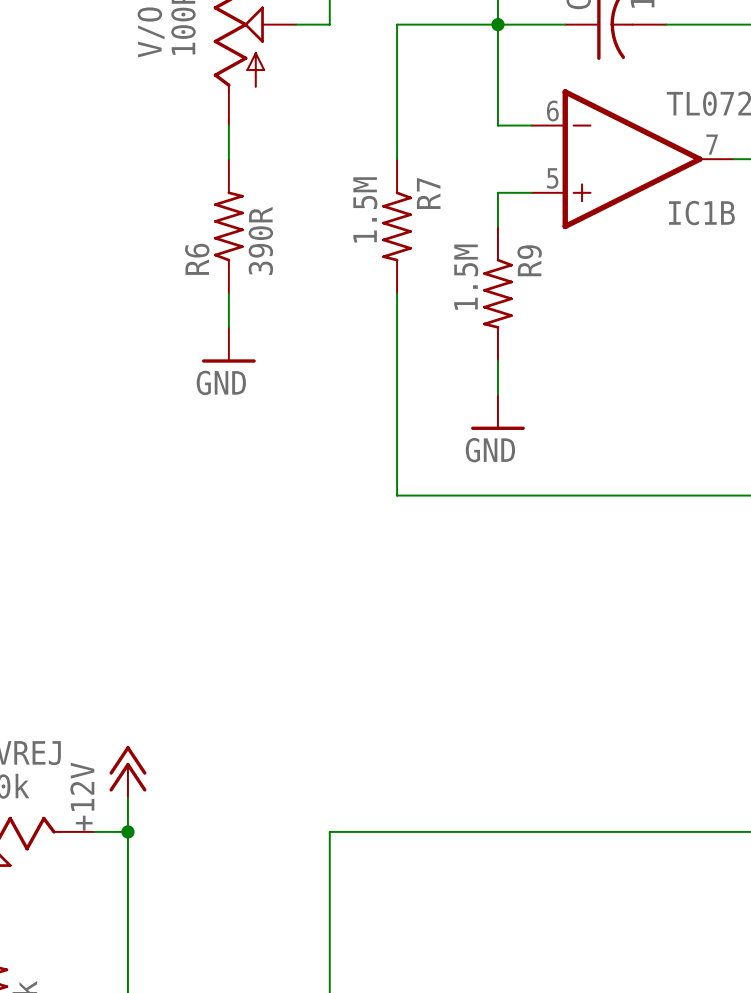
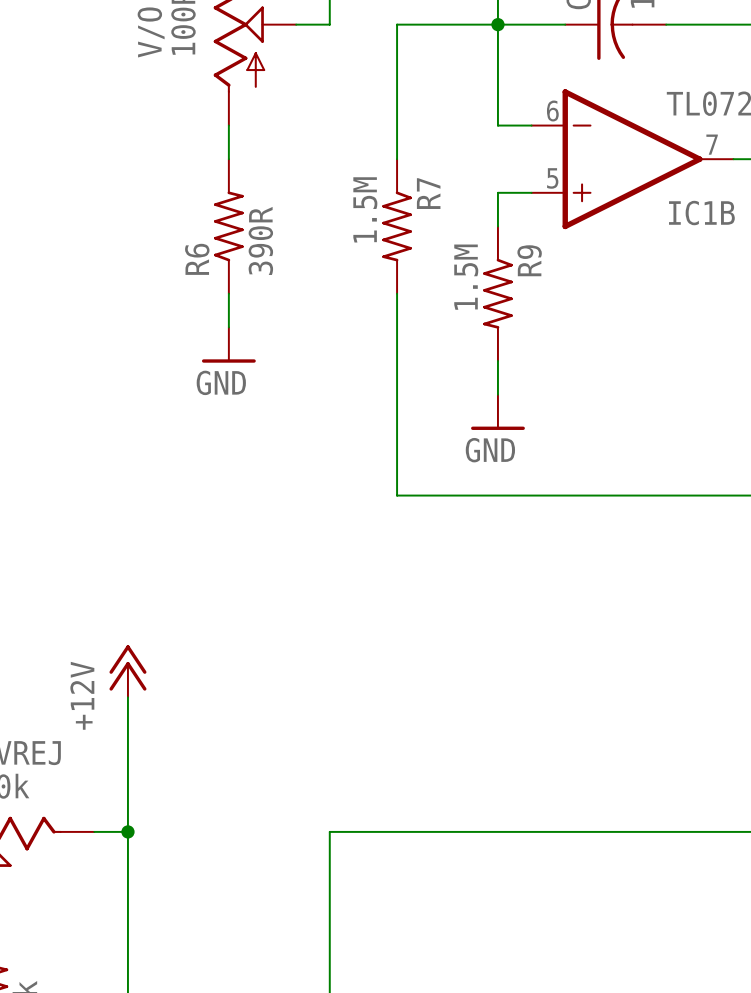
wire: none -> (127, 697) (127, 798)
power symbol position: +12V (127, 772) -> +12V (127, 671)

